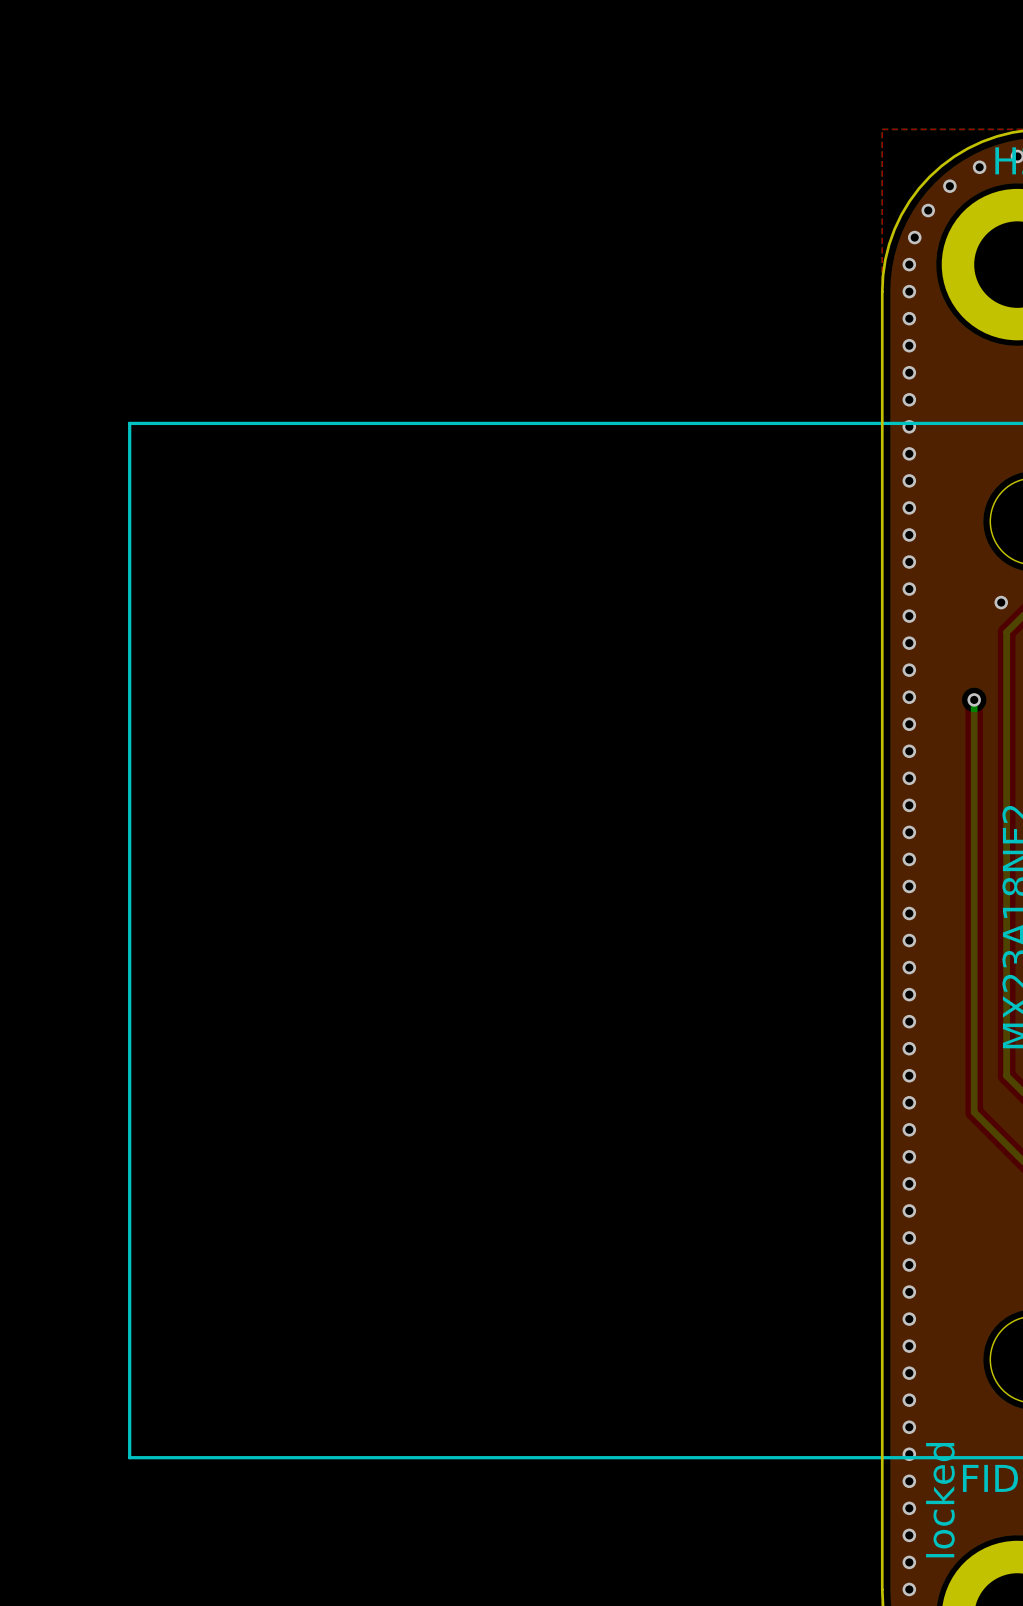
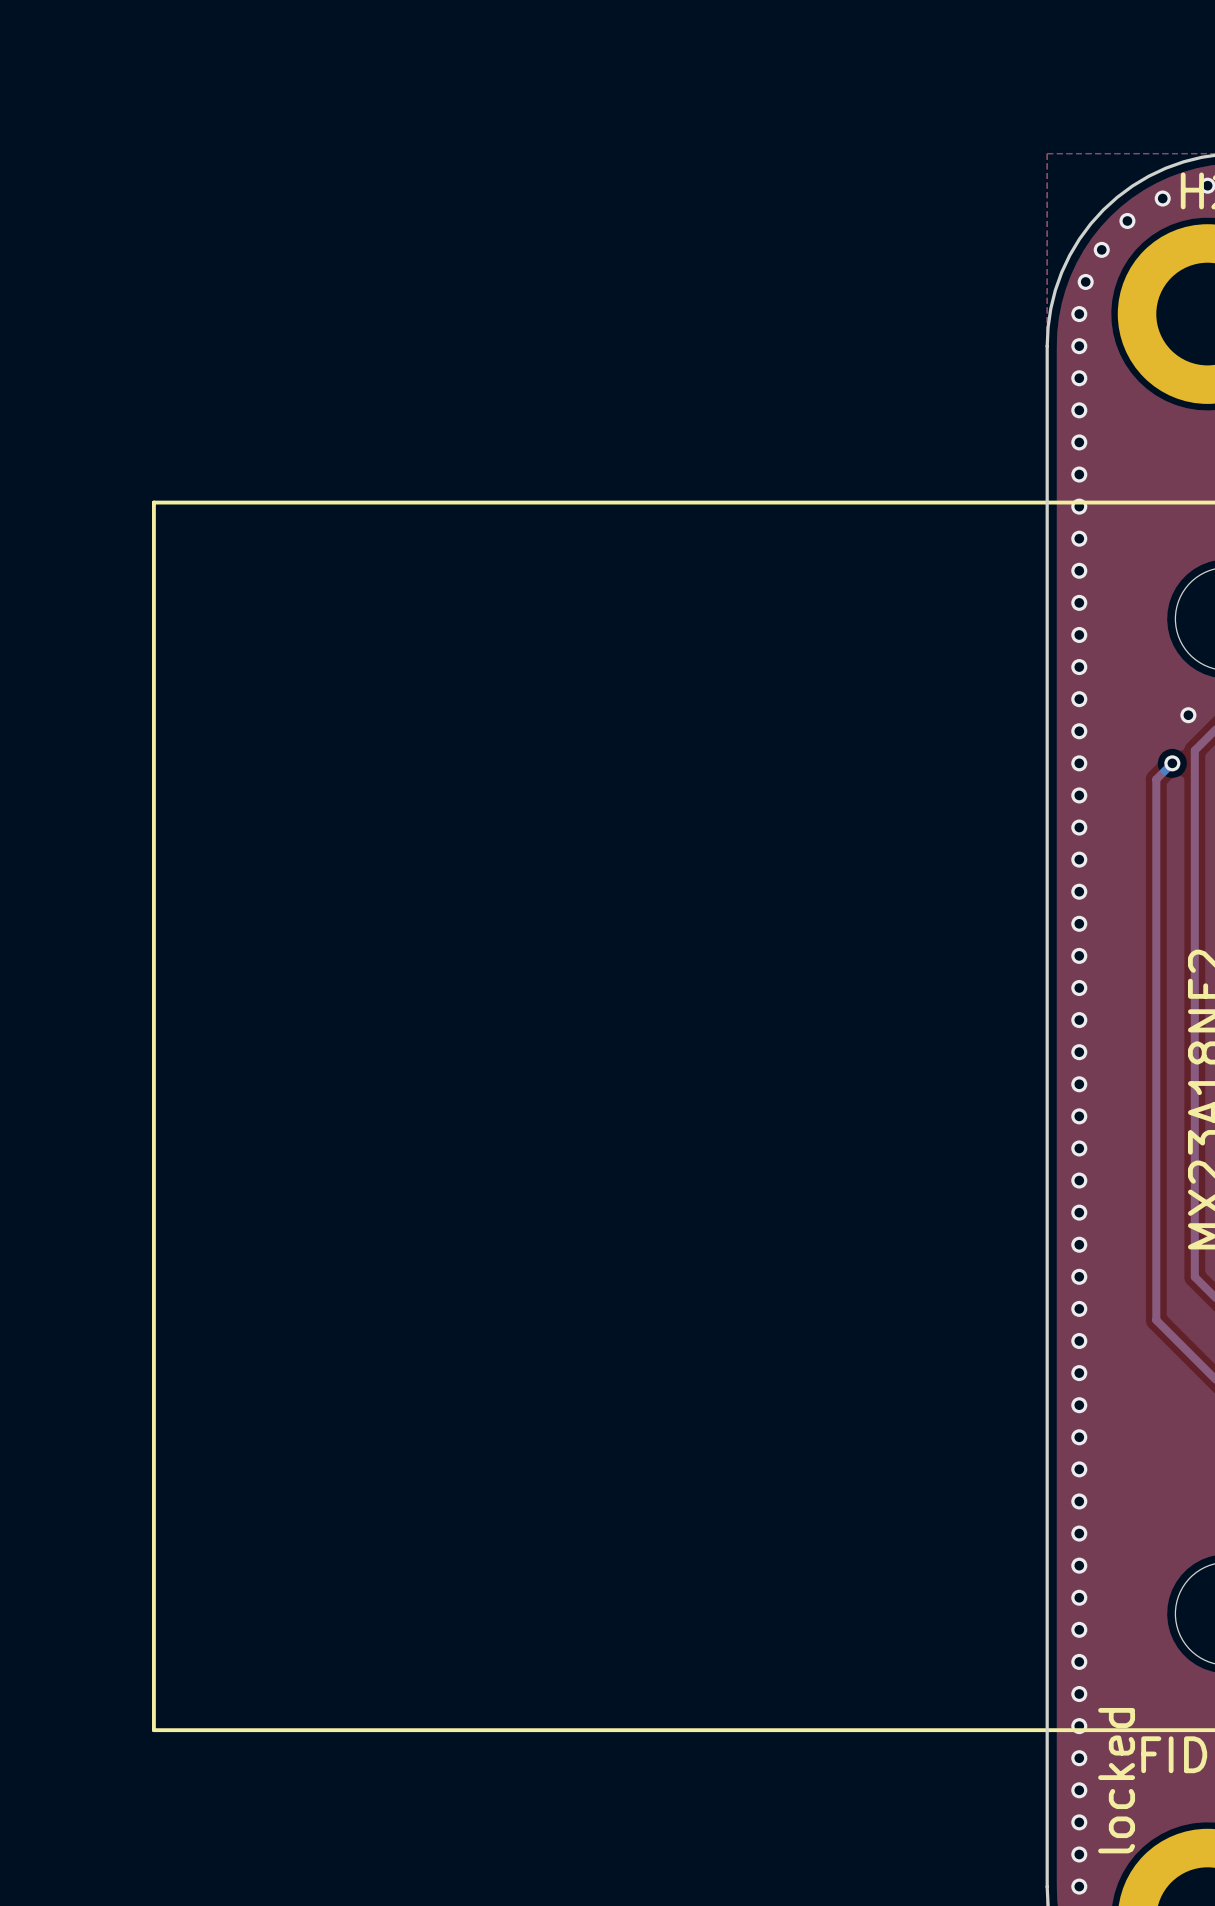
bottom track: none -> (1172, 763) (1156, 779) (1156, 830)
via position: (974, 699) -> (1172, 763)

